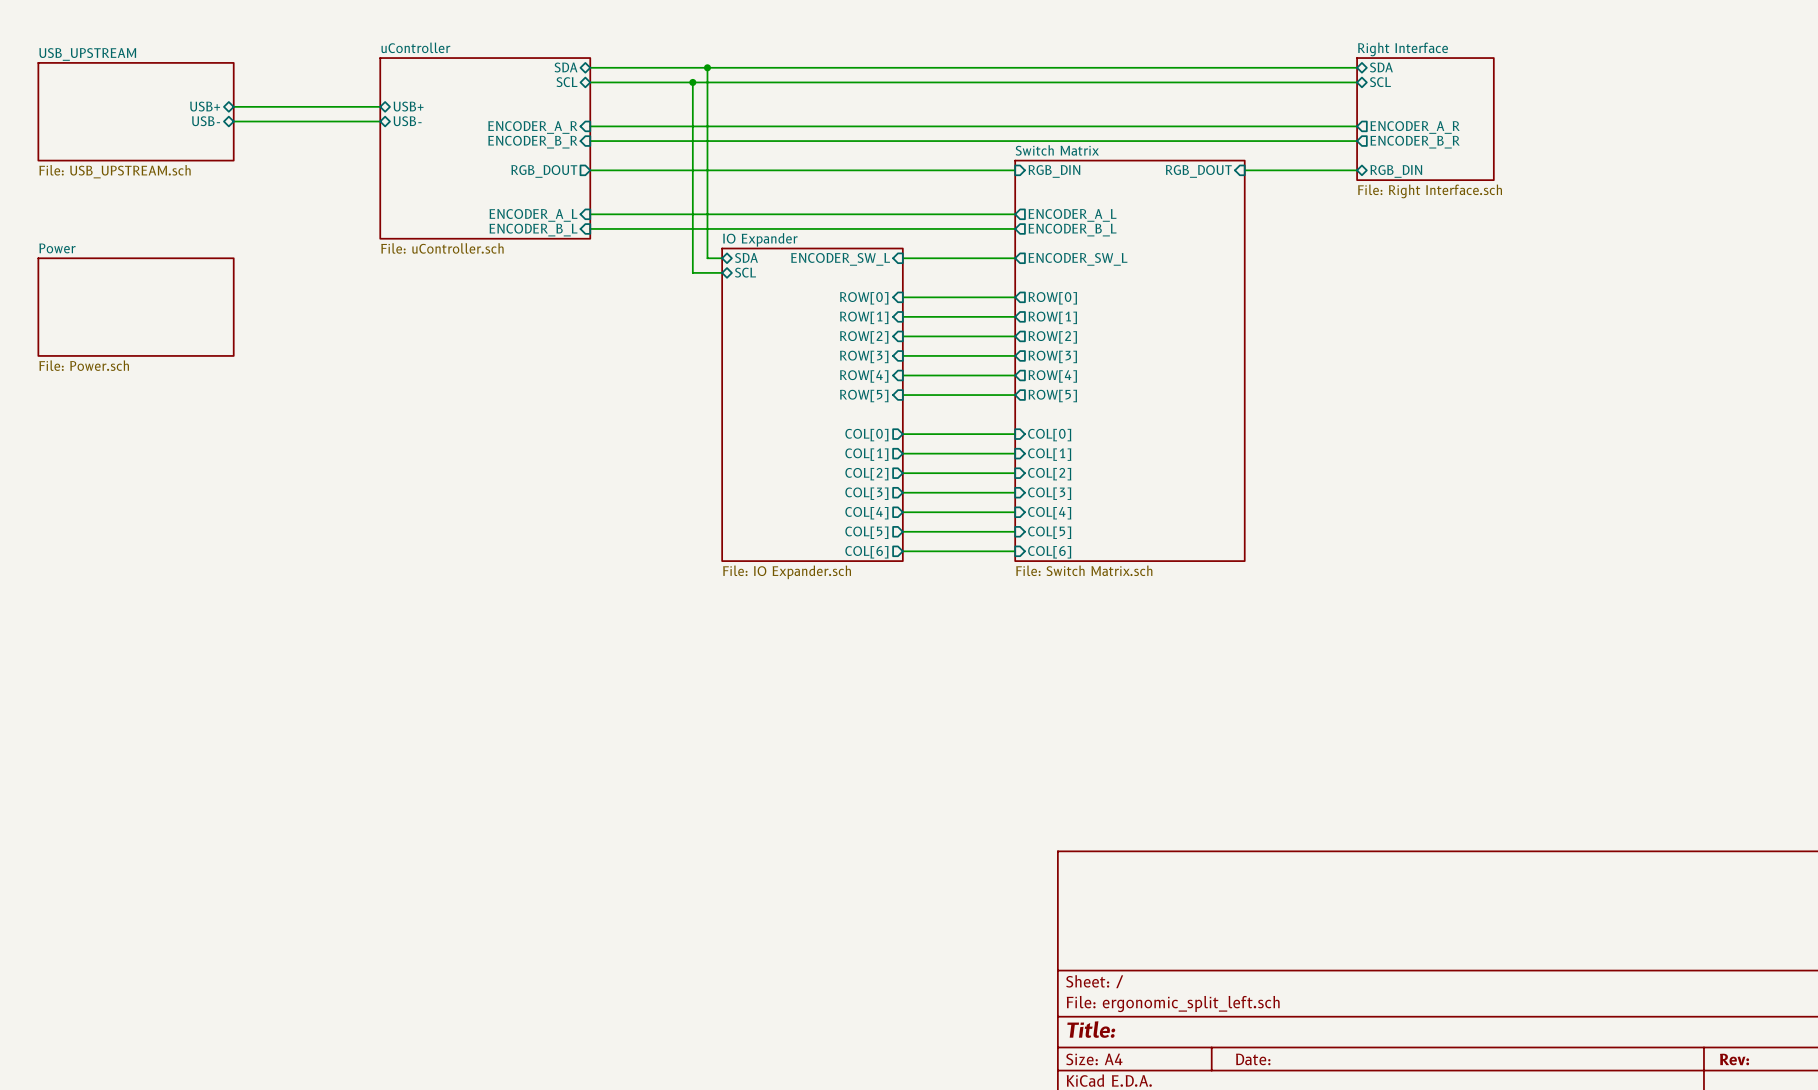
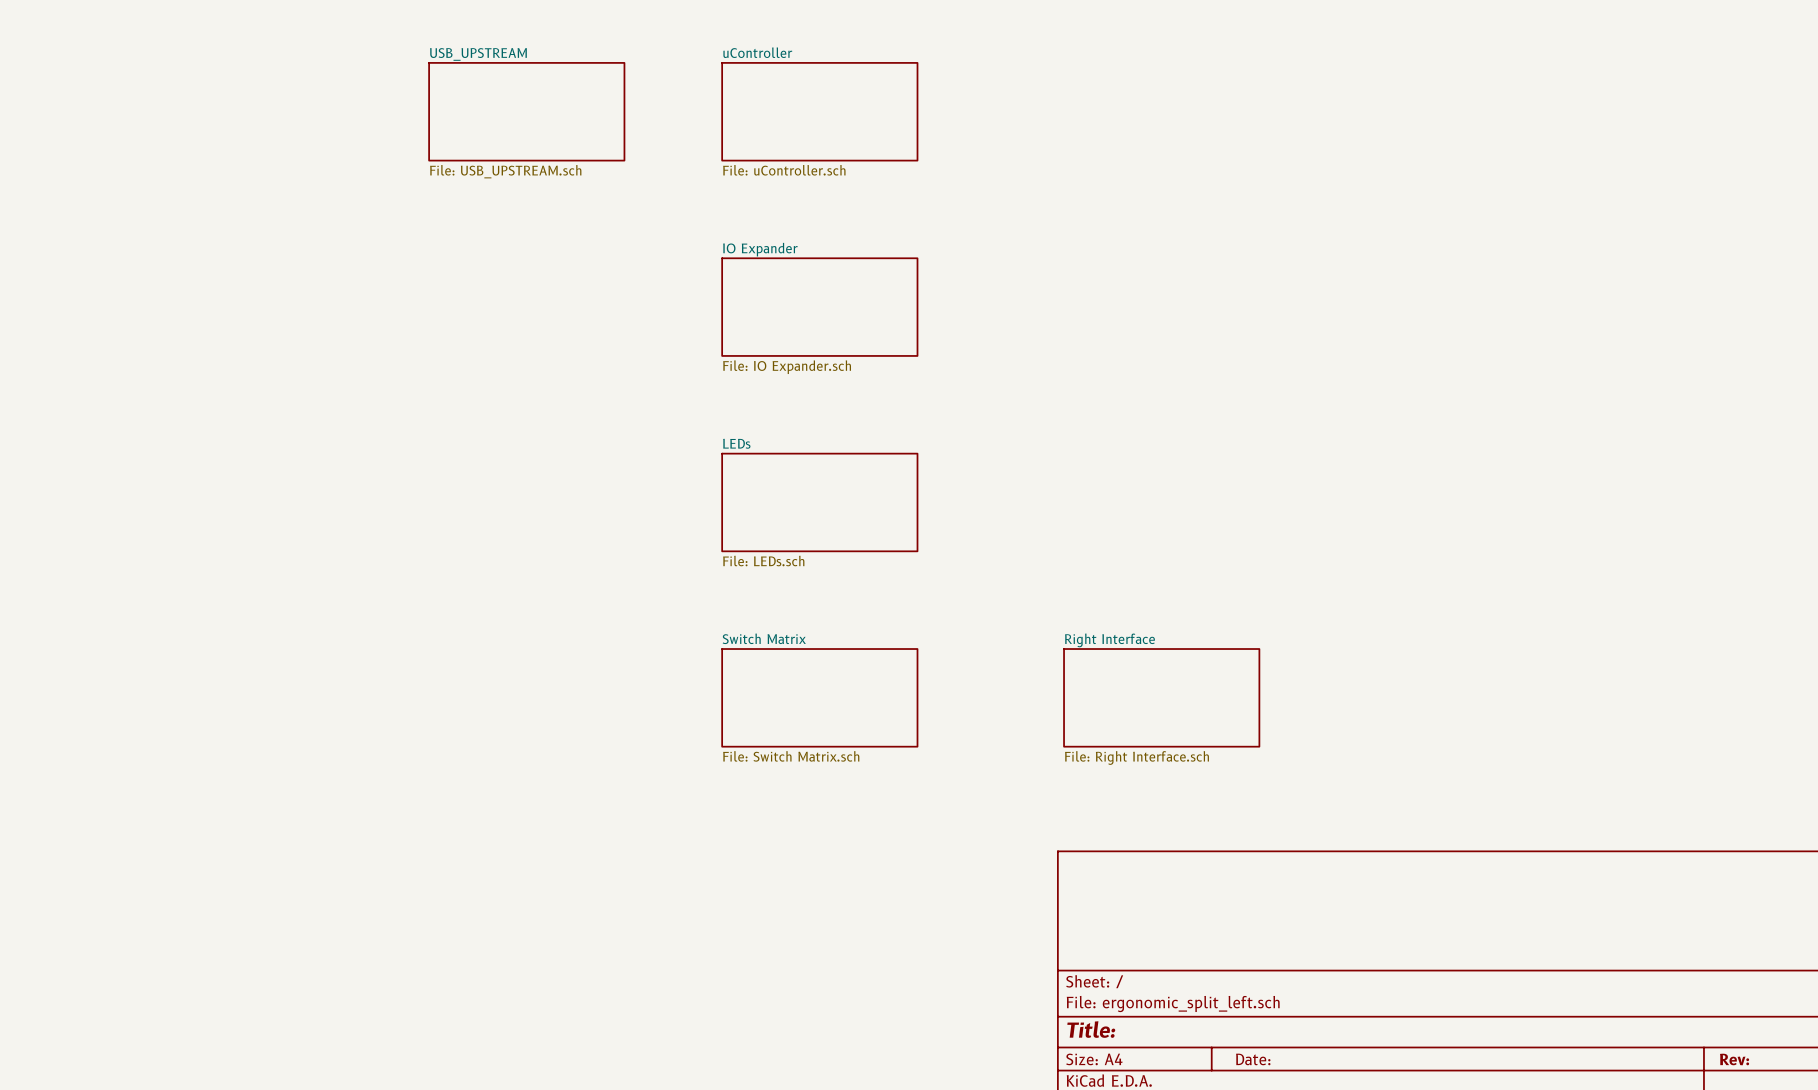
sheet pin: SDA (566, 67) -> none
wire: (590, 67) (1357, 67) -> none
wire: (707, 67) (707, 258) (722, 258) -> none
junction: (707, 67) -> none
sheet pin: SDA (1381, 67) -> none
sheet pin: SCL (567, 82) -> none
wire: (590, 82) (1357, 82) -> none
wire: (692, 82) (692, 272) (722, 272) -> none
junction: (692, 82) -> none
sheet pin: SCL (1380, 82) -> none
sheet pin: USB+ (205, 106) -> none
wire: (233, 106) (380, 106) -> none
sheet pin: USB+ (408, 106) -> none
sheet USB_UPSTREAM: File: USB_UPSTREAM.sch (136, 111) -> none
sheet USB_UPSTREAM: none -> File: USB_UPSTREAM.sch (526, 111)
sheet uController: none -> File: uController.sch (819, 111)
sheet Right Interface: File: Right Interface.sch (1425, 119) -> none
sheet pin: USB- (206, 121) -> none
wire: (233, 121) (380, 121) -> none
sheet pin: USB- (407, 121) -> none
wire: (590, 126) (1357, 126) -> none
sheet pin: ENCODER_A_R (532, 127) -> none
sheet pin: ENCODER_A_R (1415, 127) -> none
wire: (590, 141) (1357, 141) -> none
sheet pin: ENCODER_B_R (532, 142) -> none
sheet pin: ENCODER_B_R (1415, 142) -> none
sheet uController: File: uController.sch (485, 148) -> none
wire: (590, 170) (1015, 170) -> none
wire: (1244, 170) (1357, 170) -> none
sheet pin: RGB_DOUT (544, 171) -> none
sheet pin: RGB_DIN (1054, 171) -> none
sheet pin: RGB_DOUT (1198, 171) -> none
sheet pin: RGB_DIN (1396, 171) -> none
wire: (590, 214) (1015, 214) -> none
sheet pin: ENCODER_A_L (533, 215) -> none
sheet pin: ENCODER_A_L (1072, 215) -> none
wire: (590, 228) (1015, 228) -> none
sheet pin: ENCODER_B_L (533, 230) -> none
sheet pin: ENCODER_B_L (1072, 230) -> none
sheet pin: SDA (746, 257) -> none
wire: (902, 258) (1015, 258) -> none
sheet pin: ENCODER_SW_L (840, 259) -> none
sheet pin: ENCODER_SW_L (1078, 259) -> none
sheet pin: SCL (745, 272) -> none
wire: (902, 297) (1015, 297) -> none
sheet pin: ROW[0] (864, 298) -> none
sheet pin: ROW[0] (1052, 298) -> none
sheet Power: File: Power.sch (136, 307) -> none
sheet IO Expander: none -> File: IO Expander.sch (819, 307)
wire: (902, 316) (1015, 316) -> none
sheet pin: ROW[1] (864, 317) -> none
sheet pin: ROW[1] (1052, 317) -> none
wire: (902, 336) (1015, 336) -> none
sheet pin: ROW[2] (864, 337) -> none
sheet pin: ROW[2] (1052, 337) -> none
wire: (902, 355) (1015, 355) -> none
sheet pin: ROW[3] (864, 356) -> none
sheet pin: ROW[3] (1052, 356) -> none
sheet Switch Matrix: File: Switch Matrix.sch (1129, 360) -> none
wire: (902, 375) (1015, 375) -> none
sheet pin: ROW[4] (864, 376) -> none
sheet pin: ROW[4] (1052, 376) -> none
wire: (902, 395) (1015, 395) -> none
sheet pin: ROW[5] (864, 396) -> none
sheet pin: ROW[5] (1052, 396) -> none
sheet IO Expander: File: IO Expander.sch (812, 404) -> none
wire: (902, 434) (1015, 434) -> none
sheet pin: COL[0] (866, 435) -> none
sheet pin: COL[0] (1049, 435) -> none
wire: (902, 453) (1015, 453) -> none
sheet pin: COL[1] (866, 454) -> none
sheet pin: COL[1] (1049, 454) -> none
wire: (902, 473) (1015, 473) -> none
sheet pin: COL[2] (866, 474) -> none
sheet pin: COL[2] (1049, 474) -> none
wire: (902, 492) (1015, 492) -> none
sheet pin: COL[3] (866, 493) -> none
sheet pin: COL[3] (1049, 493) -> none
sheet LEDs: none -> File: LEDs.sch (819, 502)
wire: (902, 512) (1015, 512) -> none
sheet pin: COL[4] (866, 513) -> none
sheet pin: COL[4] (1049, 513) -> none
wire: (902, 531) (1015, 531) -> none
sheet pin: COL[5] (866, 532) -> none
sheet pin: COL[5] (1049, 532) -> none
wire: (902, 551) (1015, 551) -> none
sheet pin: COL[6] (866, 552) -> none
sheet pin: COL[6] (1049, 552) -> none
sheet Switch Matrix: none -> File: Switch Matrix.sch (819, 697)
sheet Right Interface: none -> File: Right Interface.sch (1161, 697)

